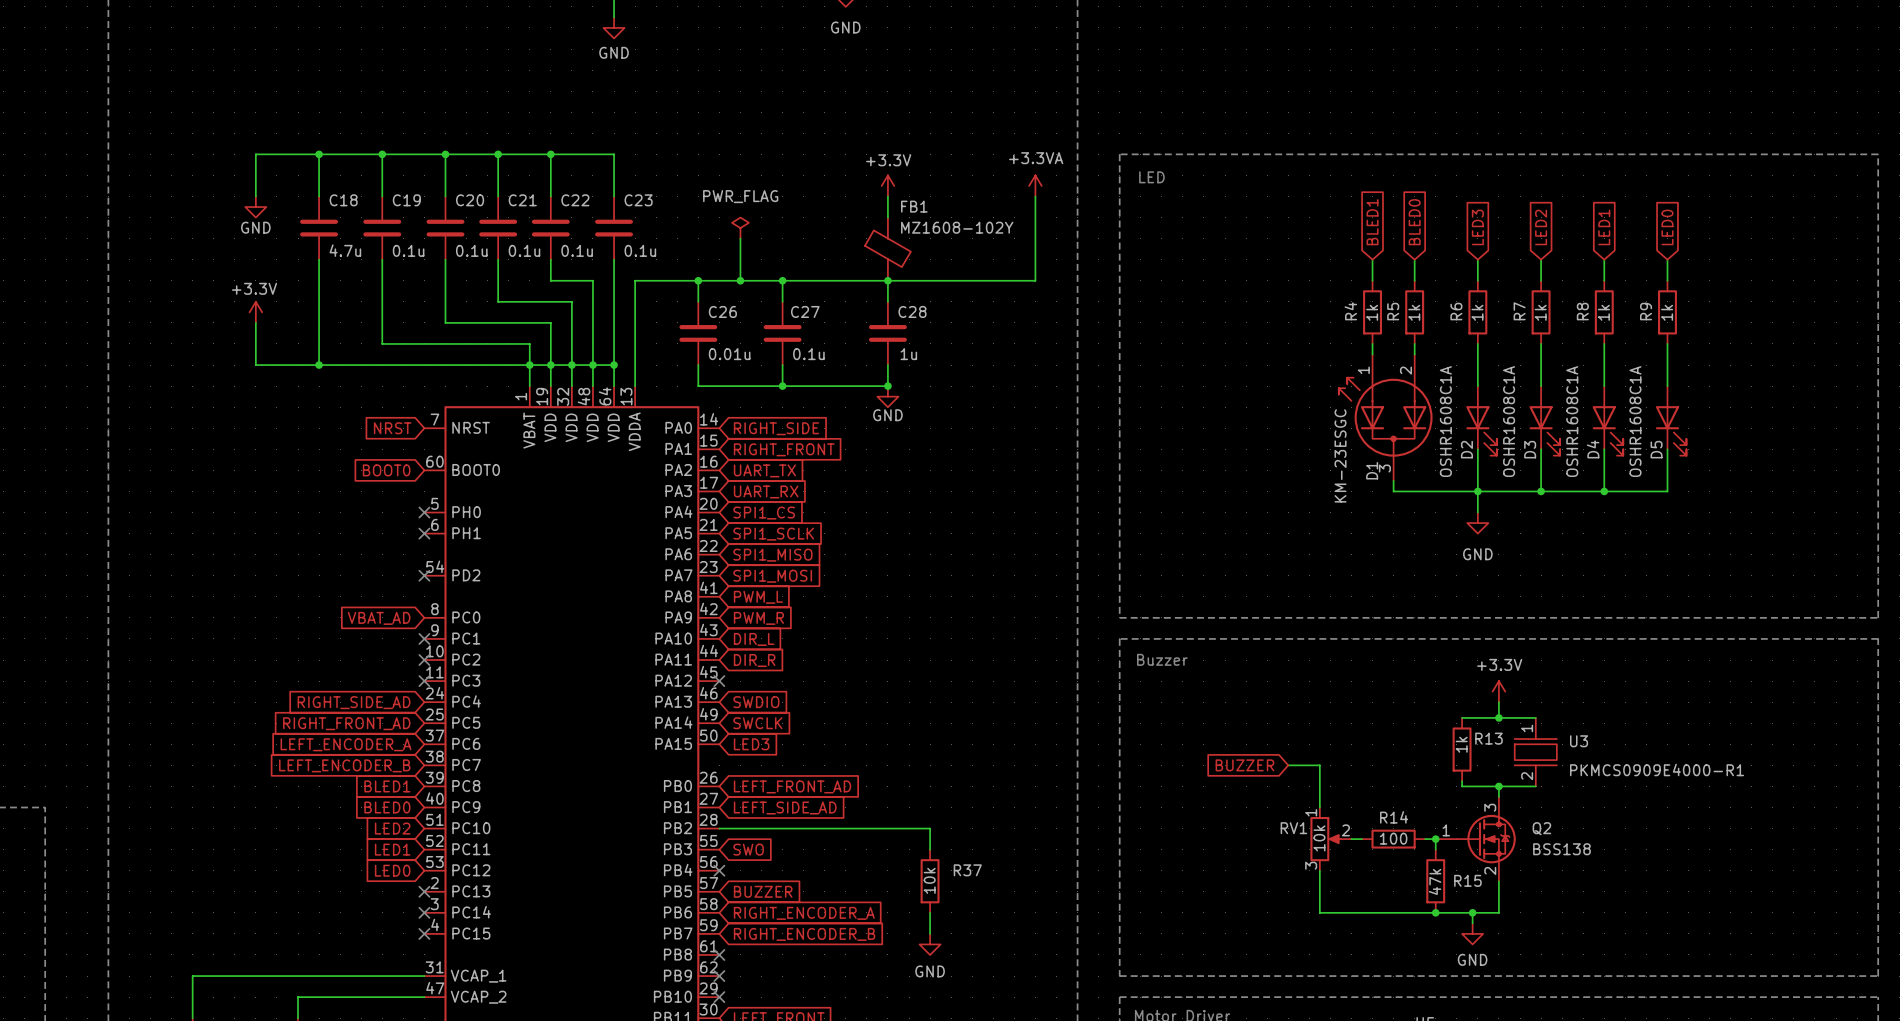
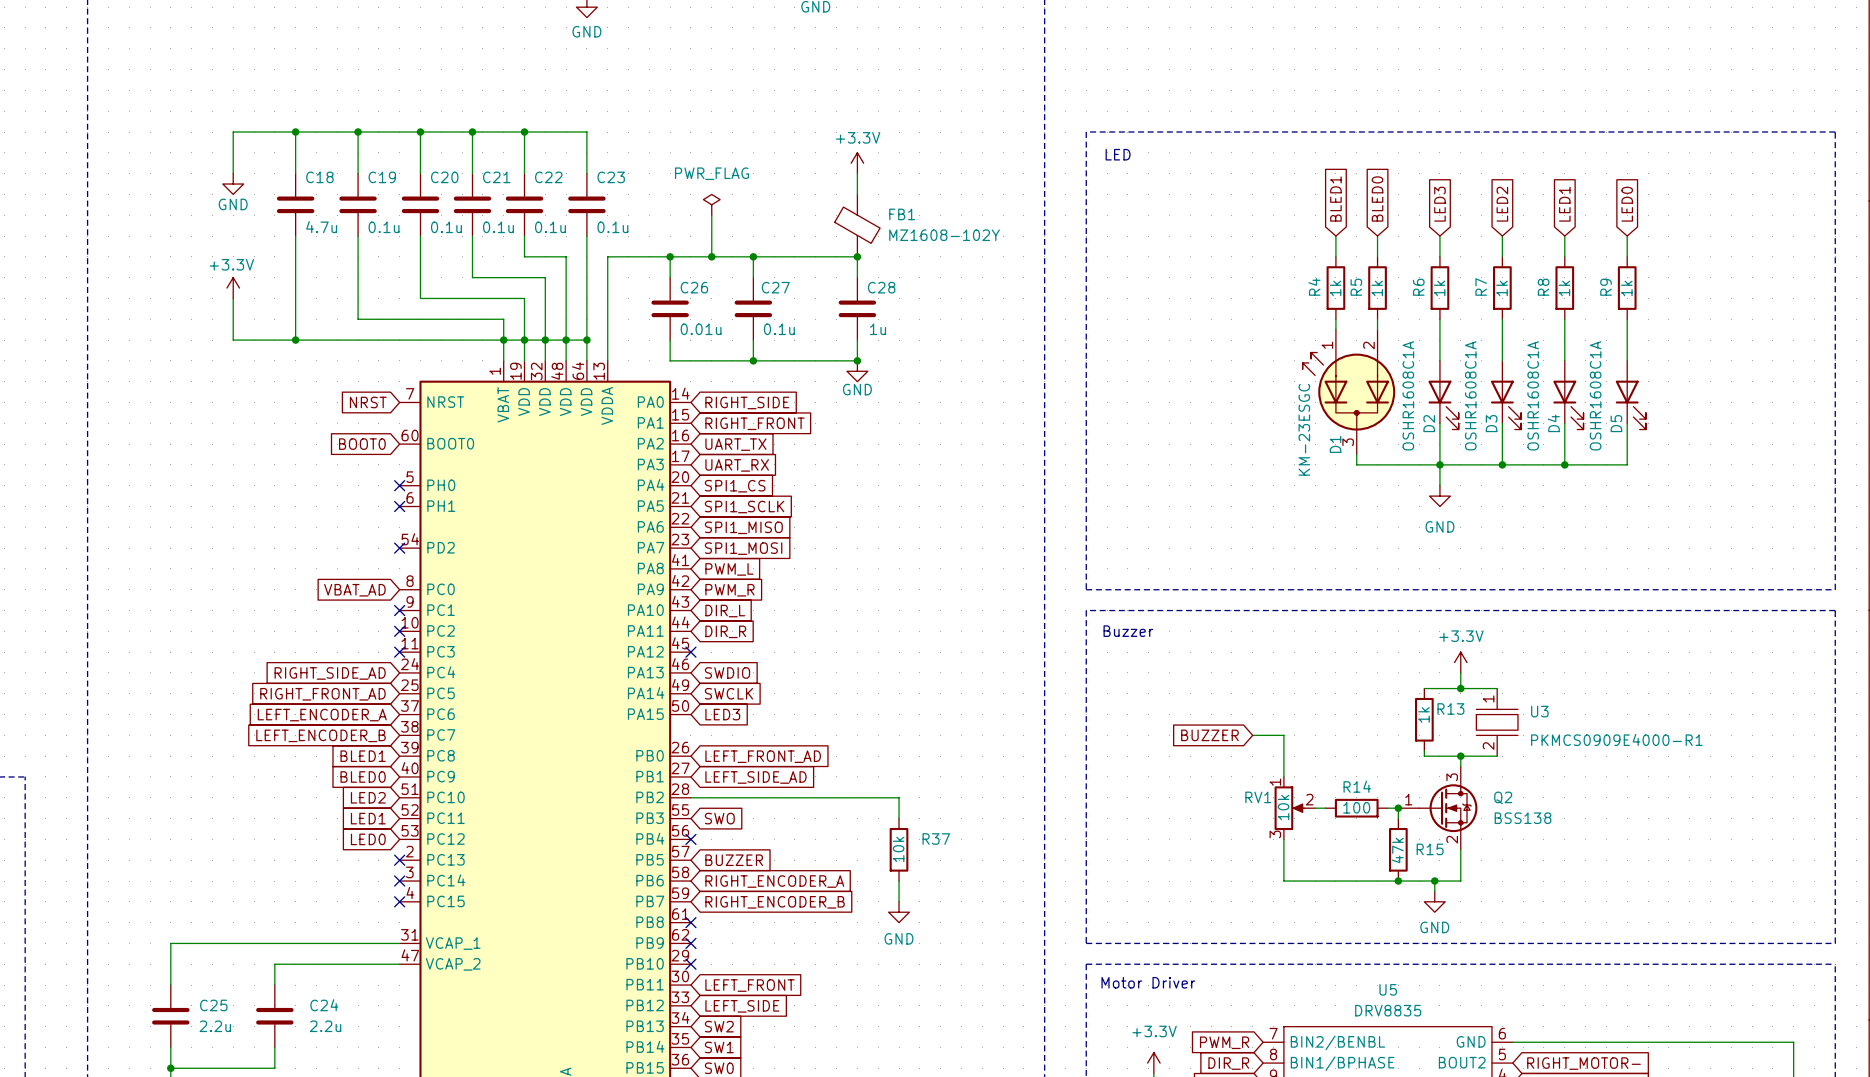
power symbol: +3.3VA (1035, 185) -> none
wire: (1035, 196) (1035, 280) (887, 280) -> none
FB1 name position: FB1 (914, 206) -> FB1 (902, 214)
FB1 value position: MZ1608-102Y (957, 227) -> MZ1608-102Y (944, 235)

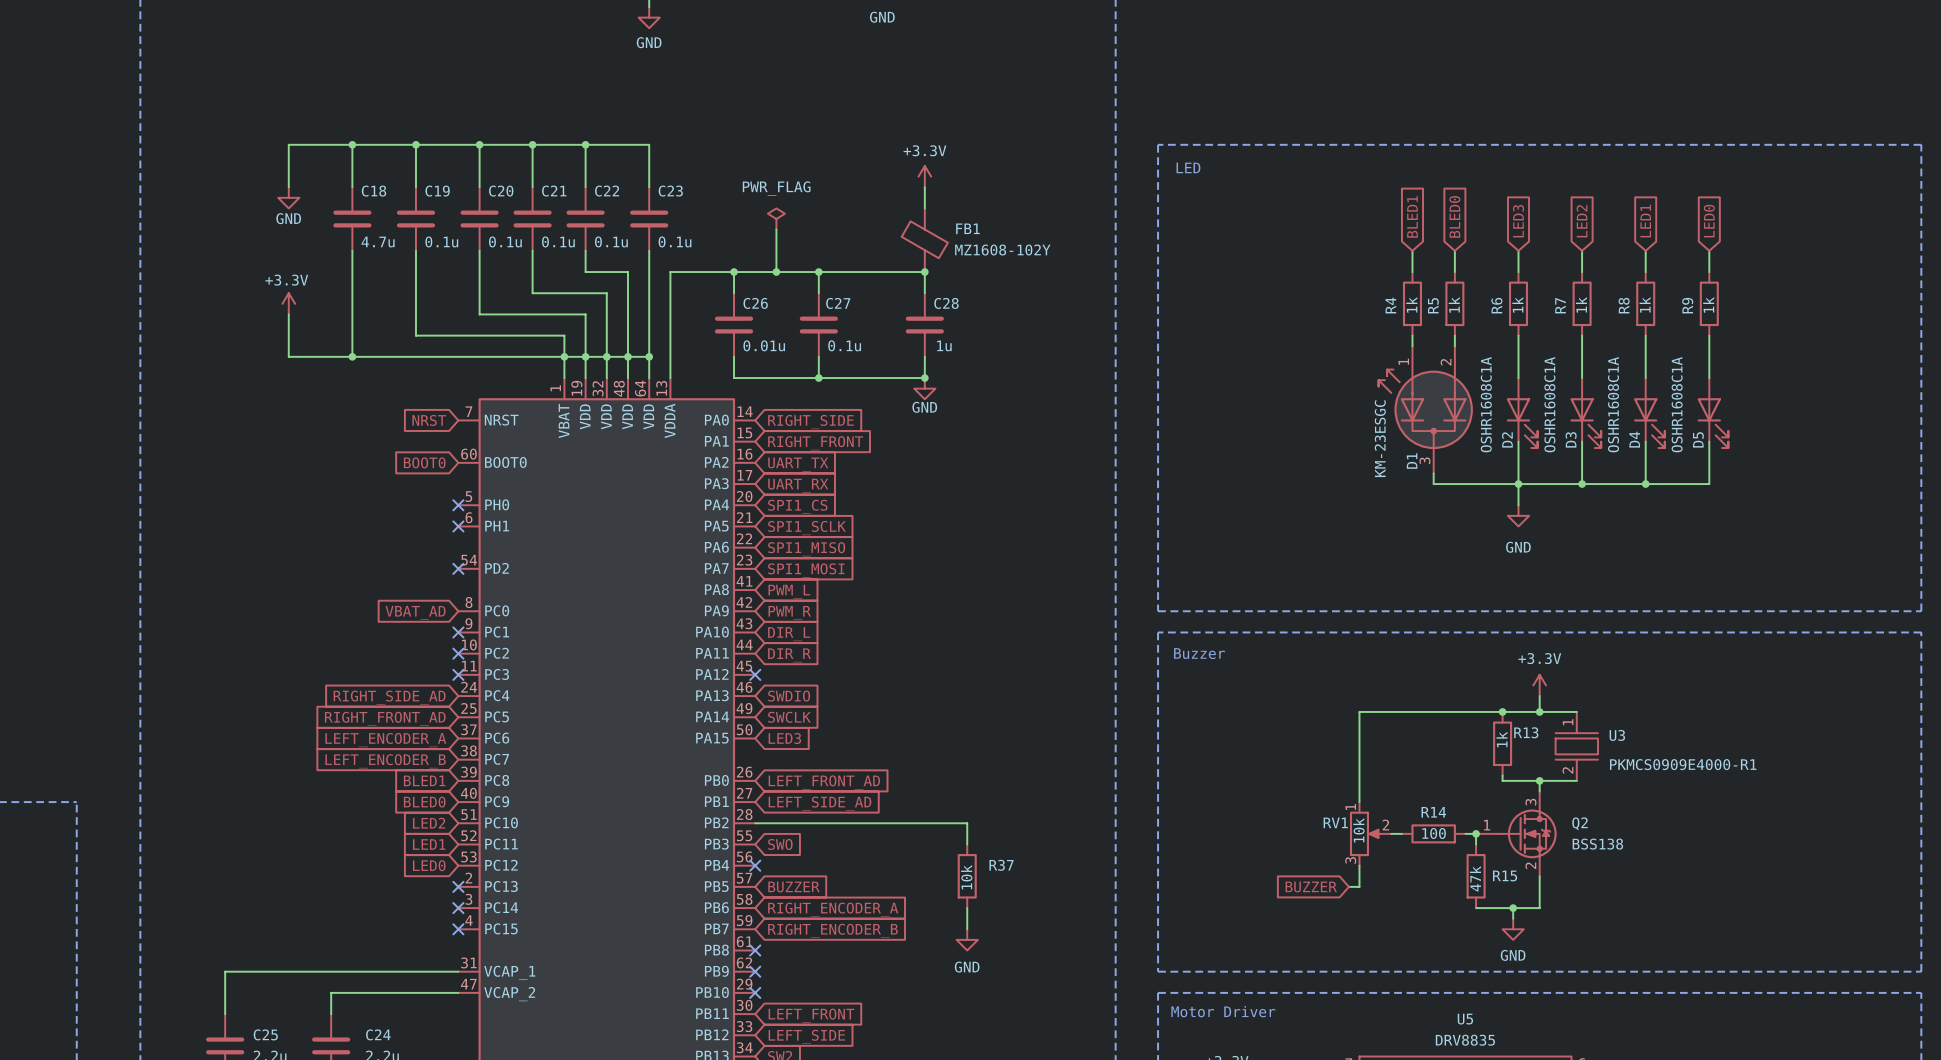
junction: none -> (1502, 711)
global label position: BUZZER (1209, 735) -> BUZZER (1311, 886)
wire: (1252, 735) (1283, 735) -> (1502, 711) (1359, 711) (1359, 759)
wire: (1283, 860) (1283, 881) (1398, 881) -> (1359, 886) (1348, 886)
junction: (1398, 881) -> none

